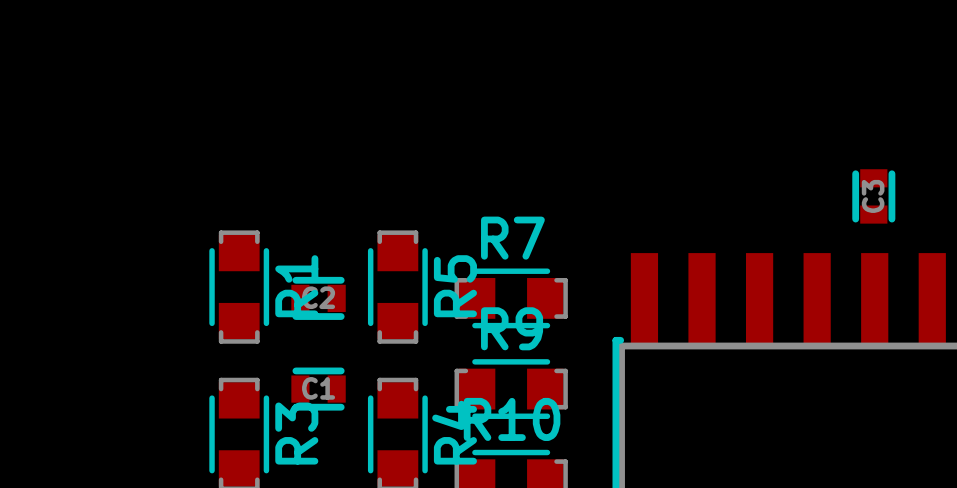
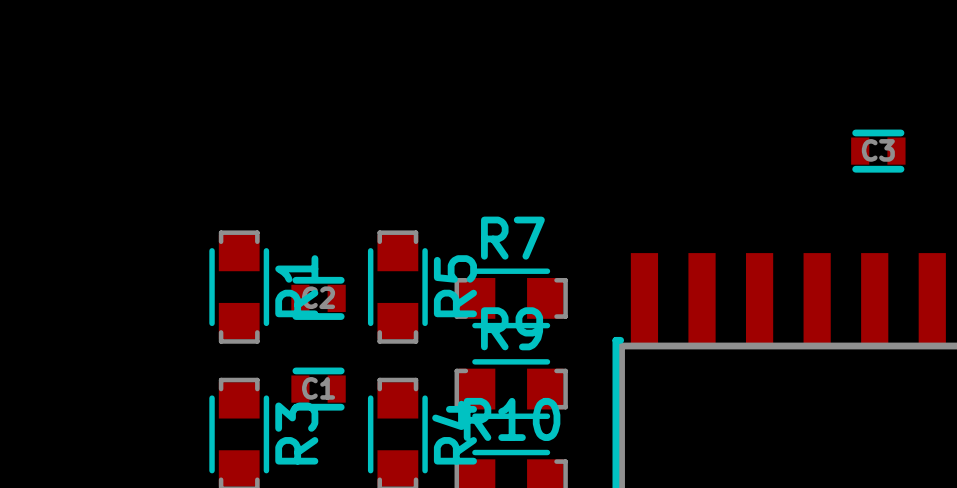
C3 rotation: 0° (873, 196) -> 90° clockwise (878, 151)
C3 position: (873, 196) -> (878, 151)

